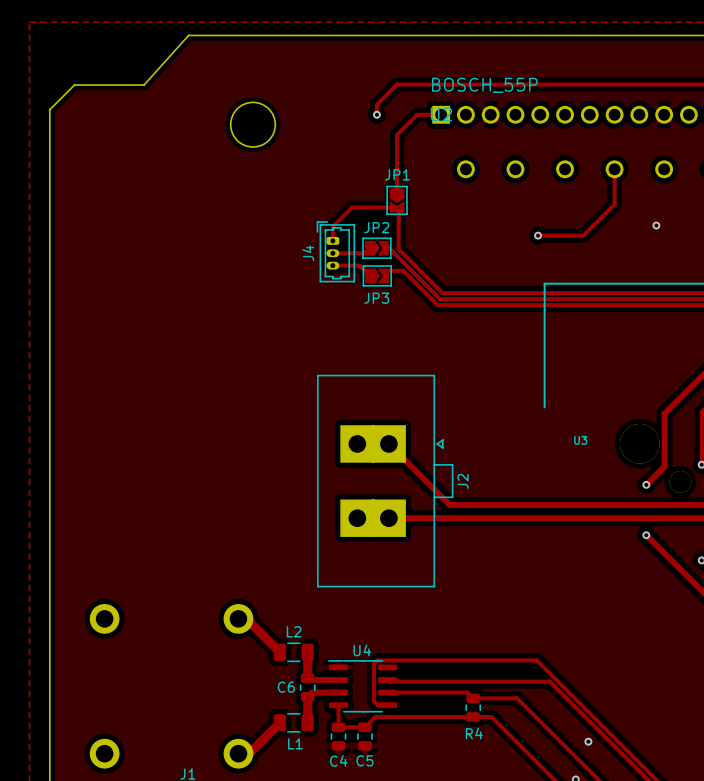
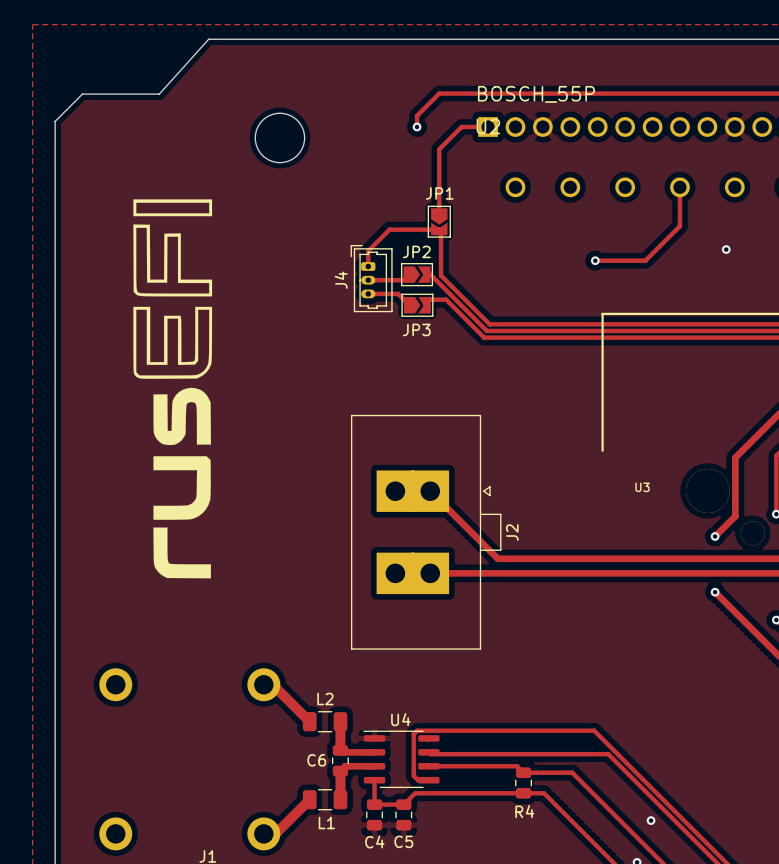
drawing: none -> [133, 199, 213, 579]

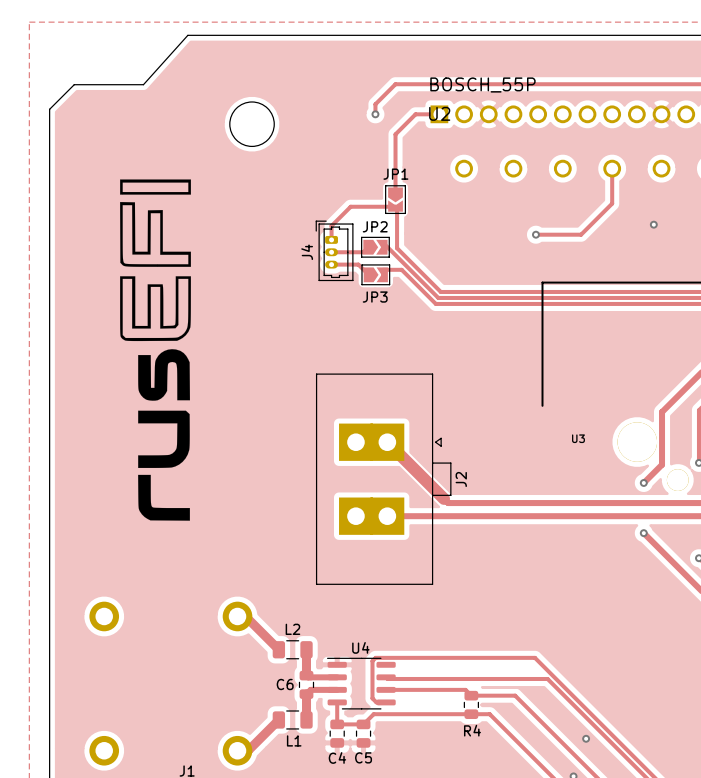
track width: thin (430, 491) (493, 554) -> thick (387, 442) (444, 498)

